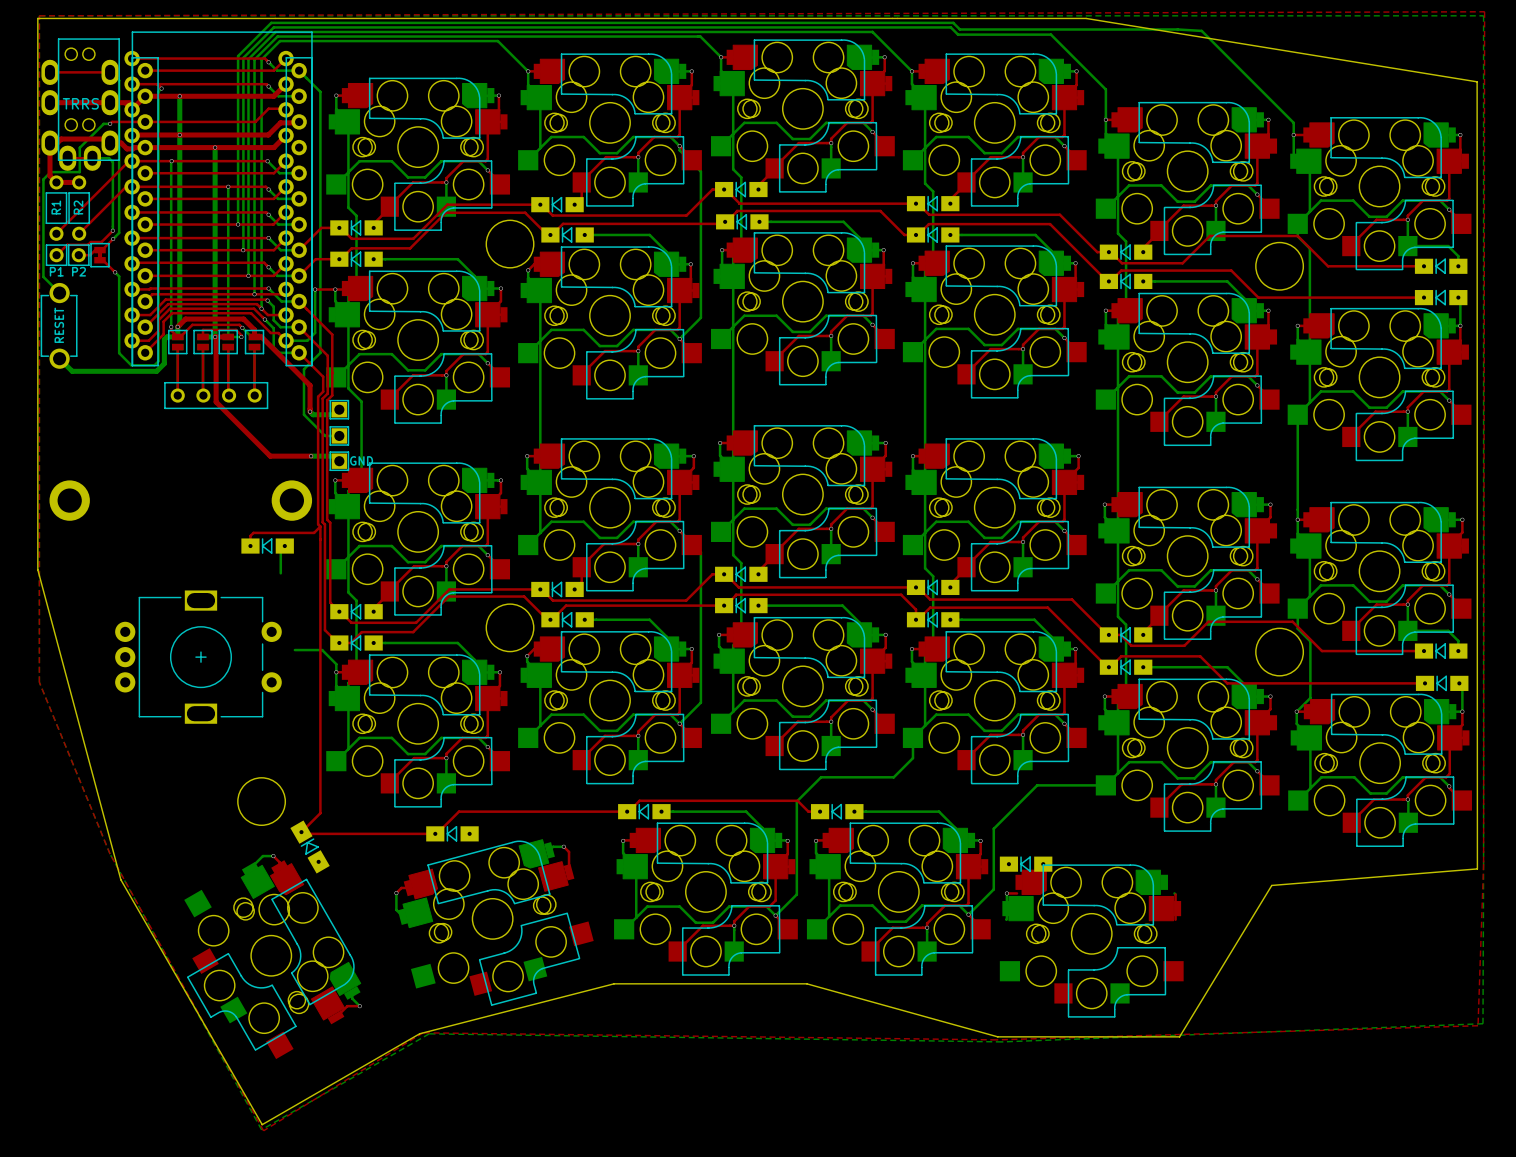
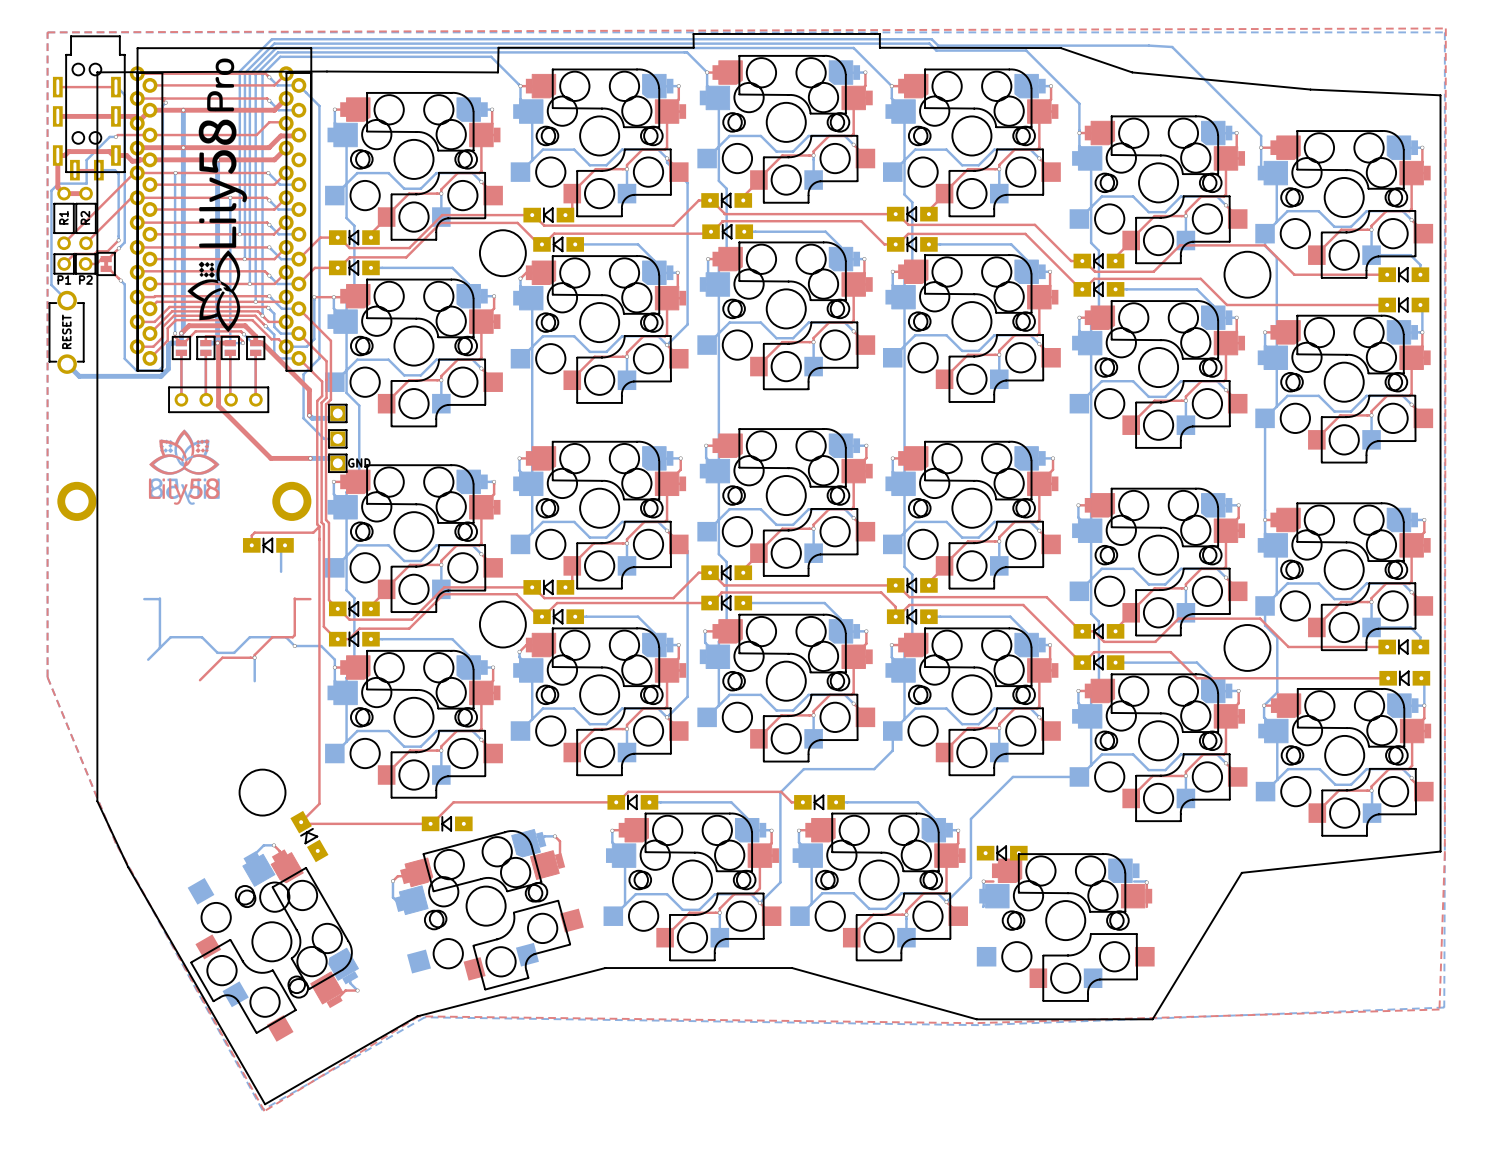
board edge: (37, 18) (1086, 18) (1477, 81) (1477, 868) (1271, 885) (1179, 1036) (997, 1036) (806, 983) (614, 983) (419, 1033) (262, 1124) (120, 879) (37, 569) (37, 18) -> (693, 33) (693, 47) (498, 47) (498, 72) (97, 72) (97, 801) (128, 867) (265, 1104) (417, 1016) (605, 968) (792, 968) (976, 1019) (1152, 1019) (1241, 872) (1440, 851) (1440, 95) (1310, 89) (1132, 72) (1060, 48) (879, 47) (879, 33) (693, 33)
drawing: none -> [187, 58, 248, 332]
part: none -> (89, 107)
part: (80, 104) -> none
drawing: none -> [148, 429, 220, 505]
bottom track: none -> (144, 599) (159, 598) (159, 647)
top track: none -> (310, 599) (294, 598) (294, 635) (292, 637) (272, 637) (254, 654) (254, 657) (222, 657) (199, 680)
bottom track: none -> (294, 646) (285, 637) (249, 637) (234, 652) (217, 652) (201, 637) (170, 637) (148, 659)
via: none -> (294, 646)
part: (198, 657) -> none
bottom track: none -> (254, 657) (254, 681)
via: none -> (254, 657)
bottom track: none -> (1134, 881) (1145, 881)
via: none -> (1146, 882)

